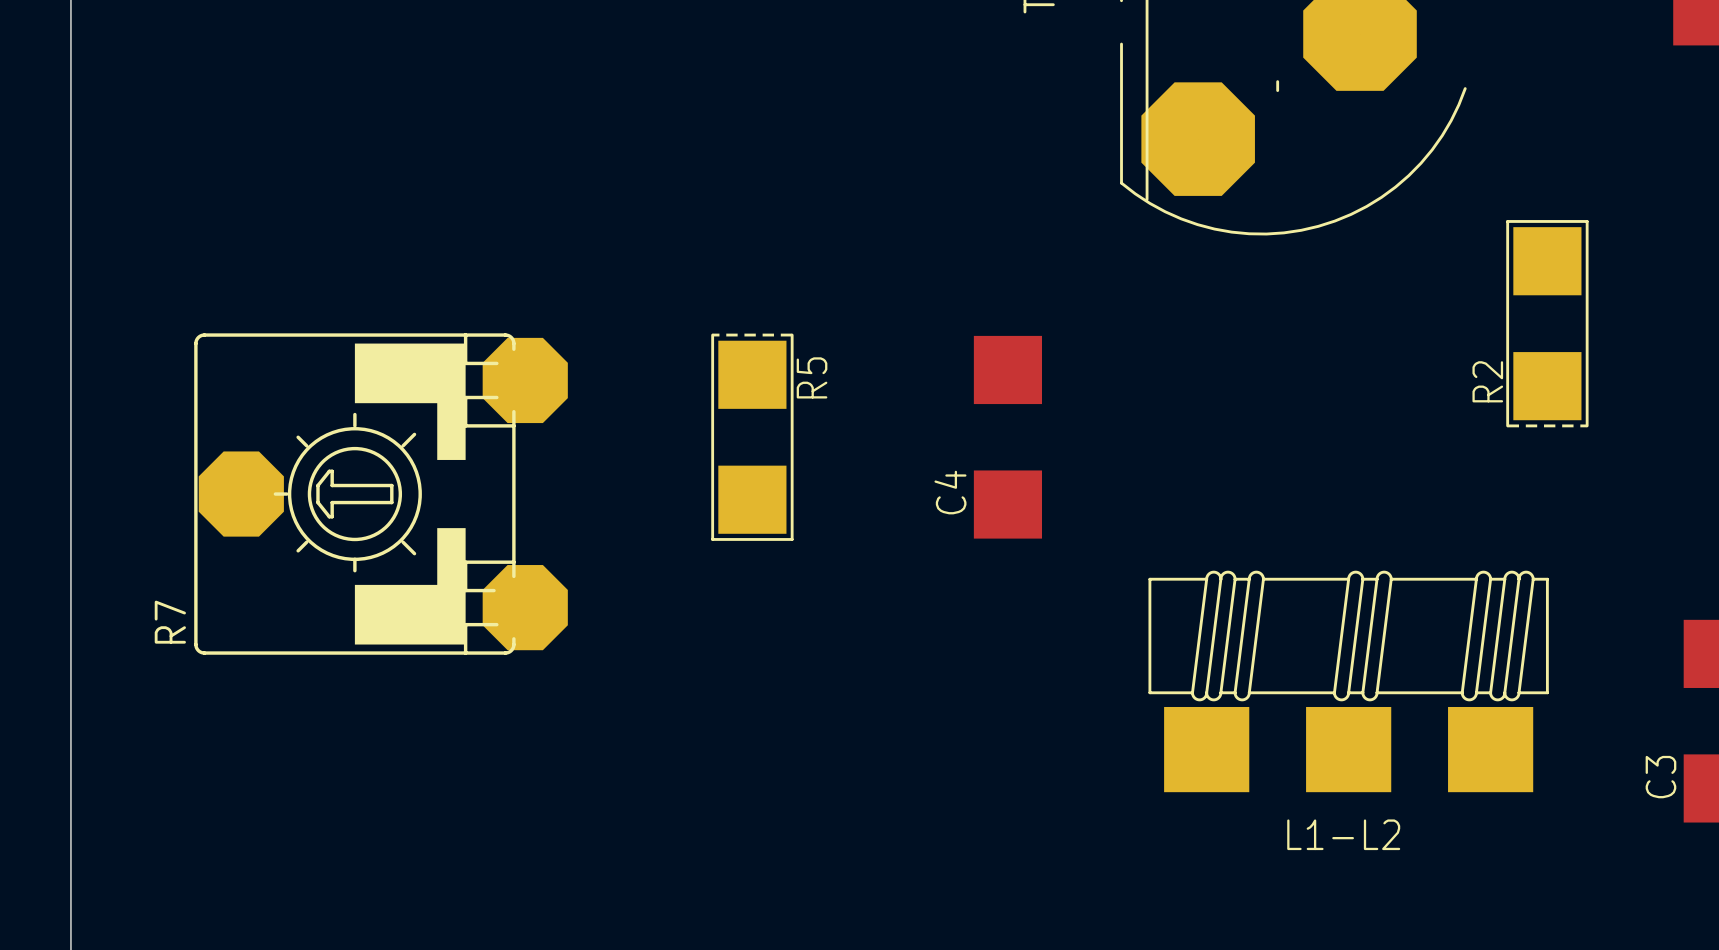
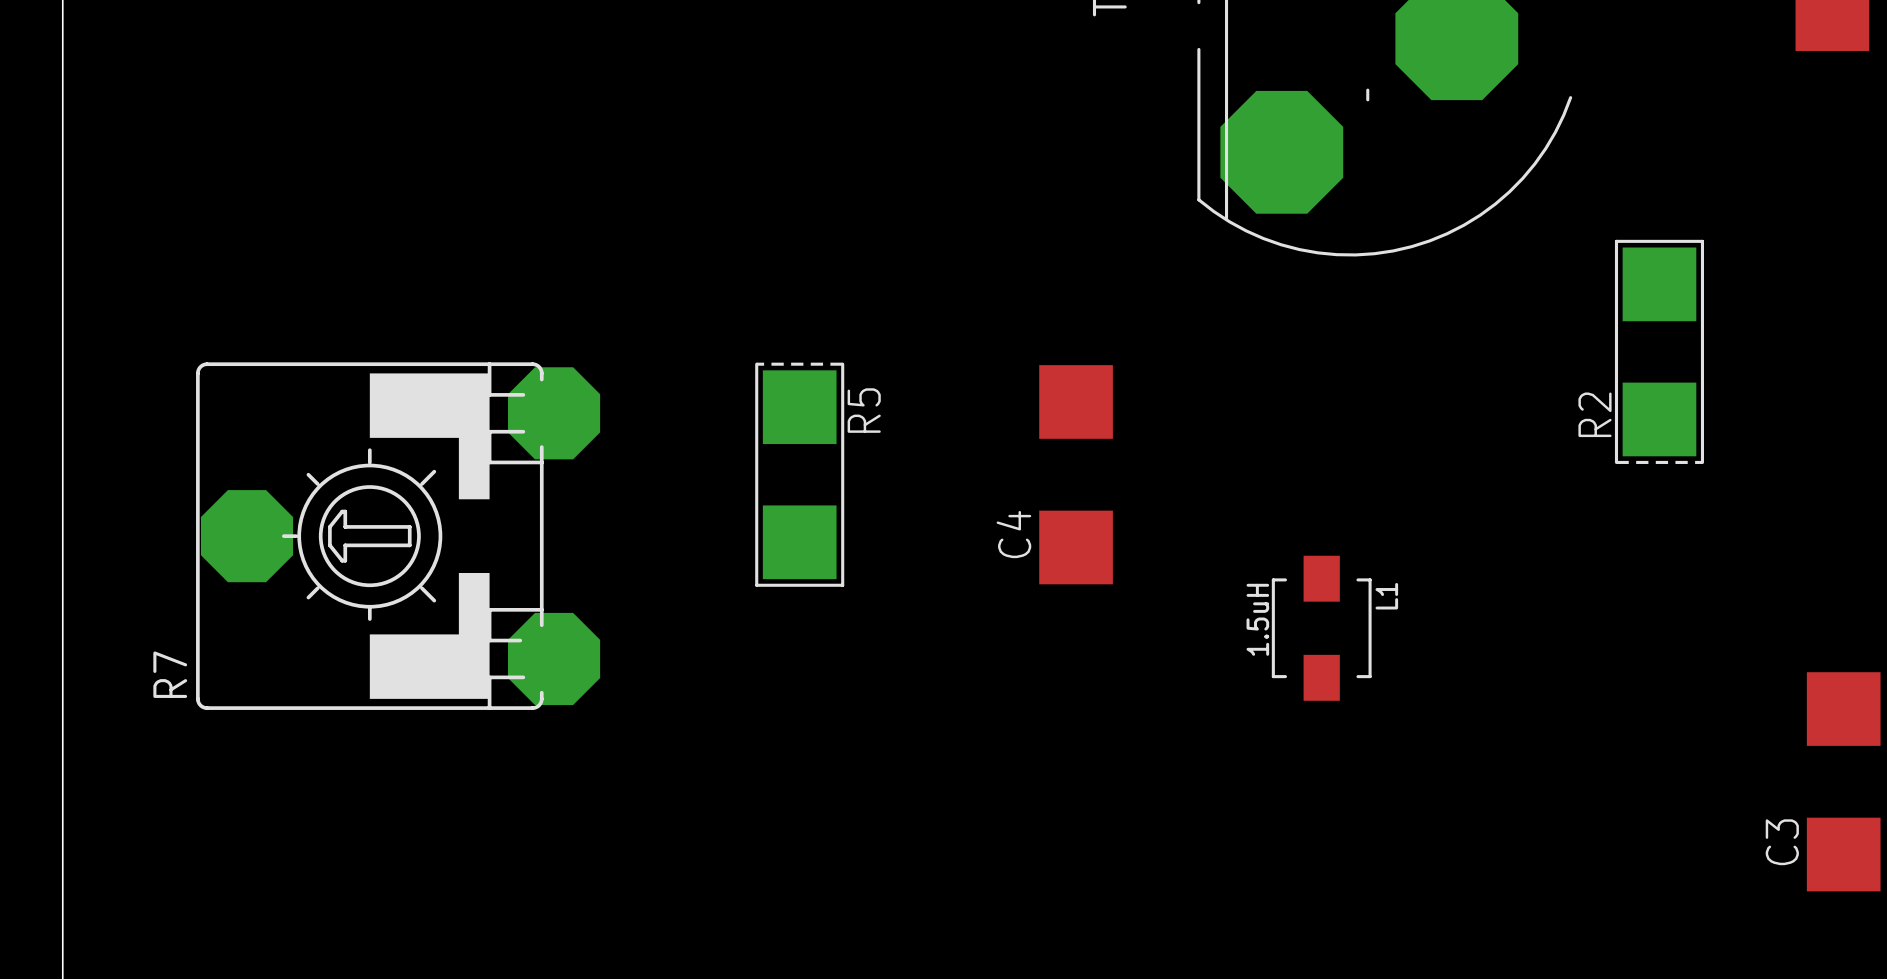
L1: none -> 1.5uH (1321, 628)
L1-L2: (1348, 681) -> none

